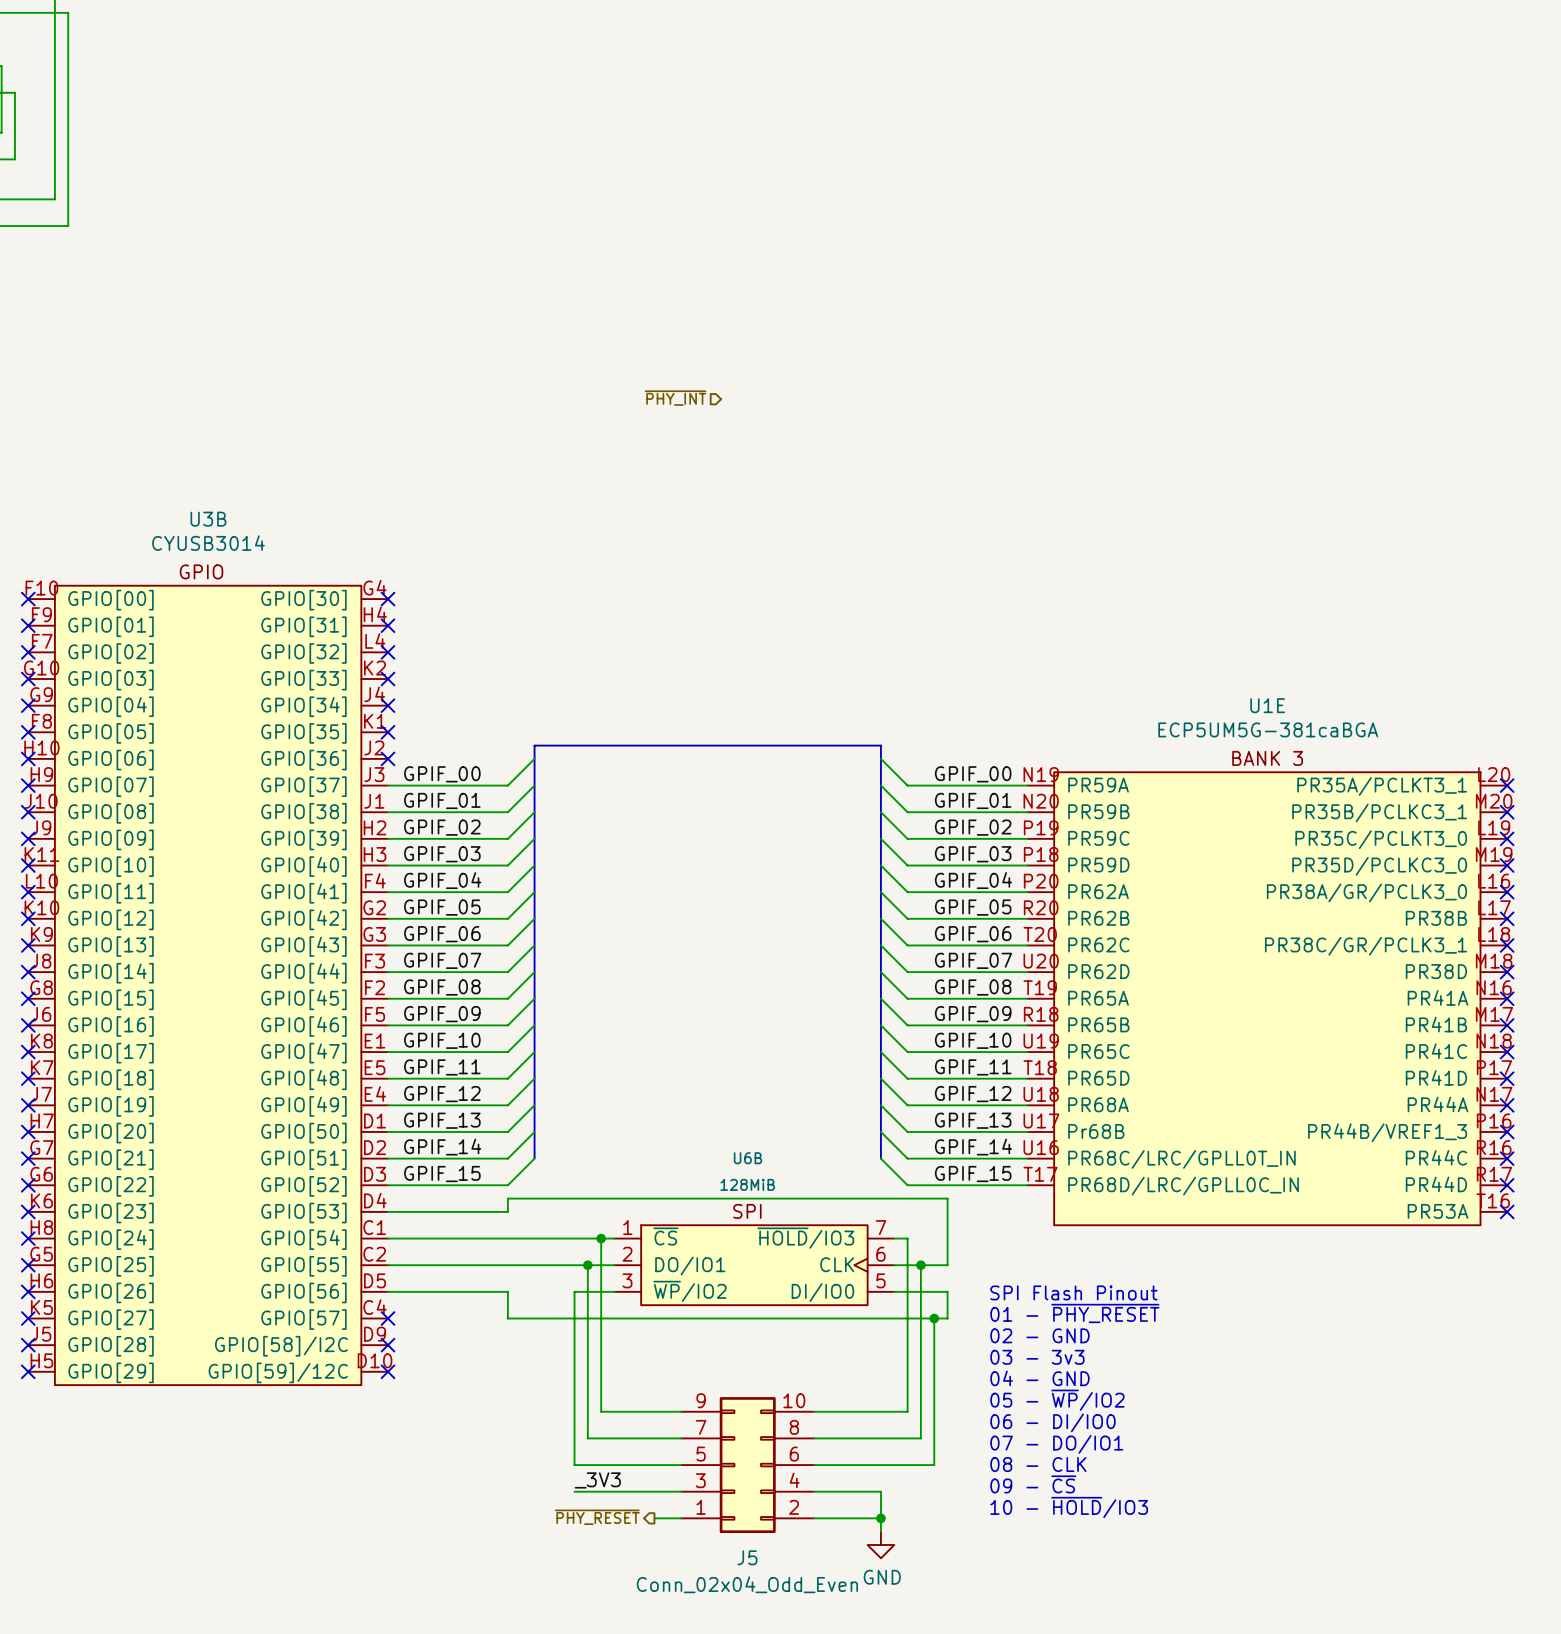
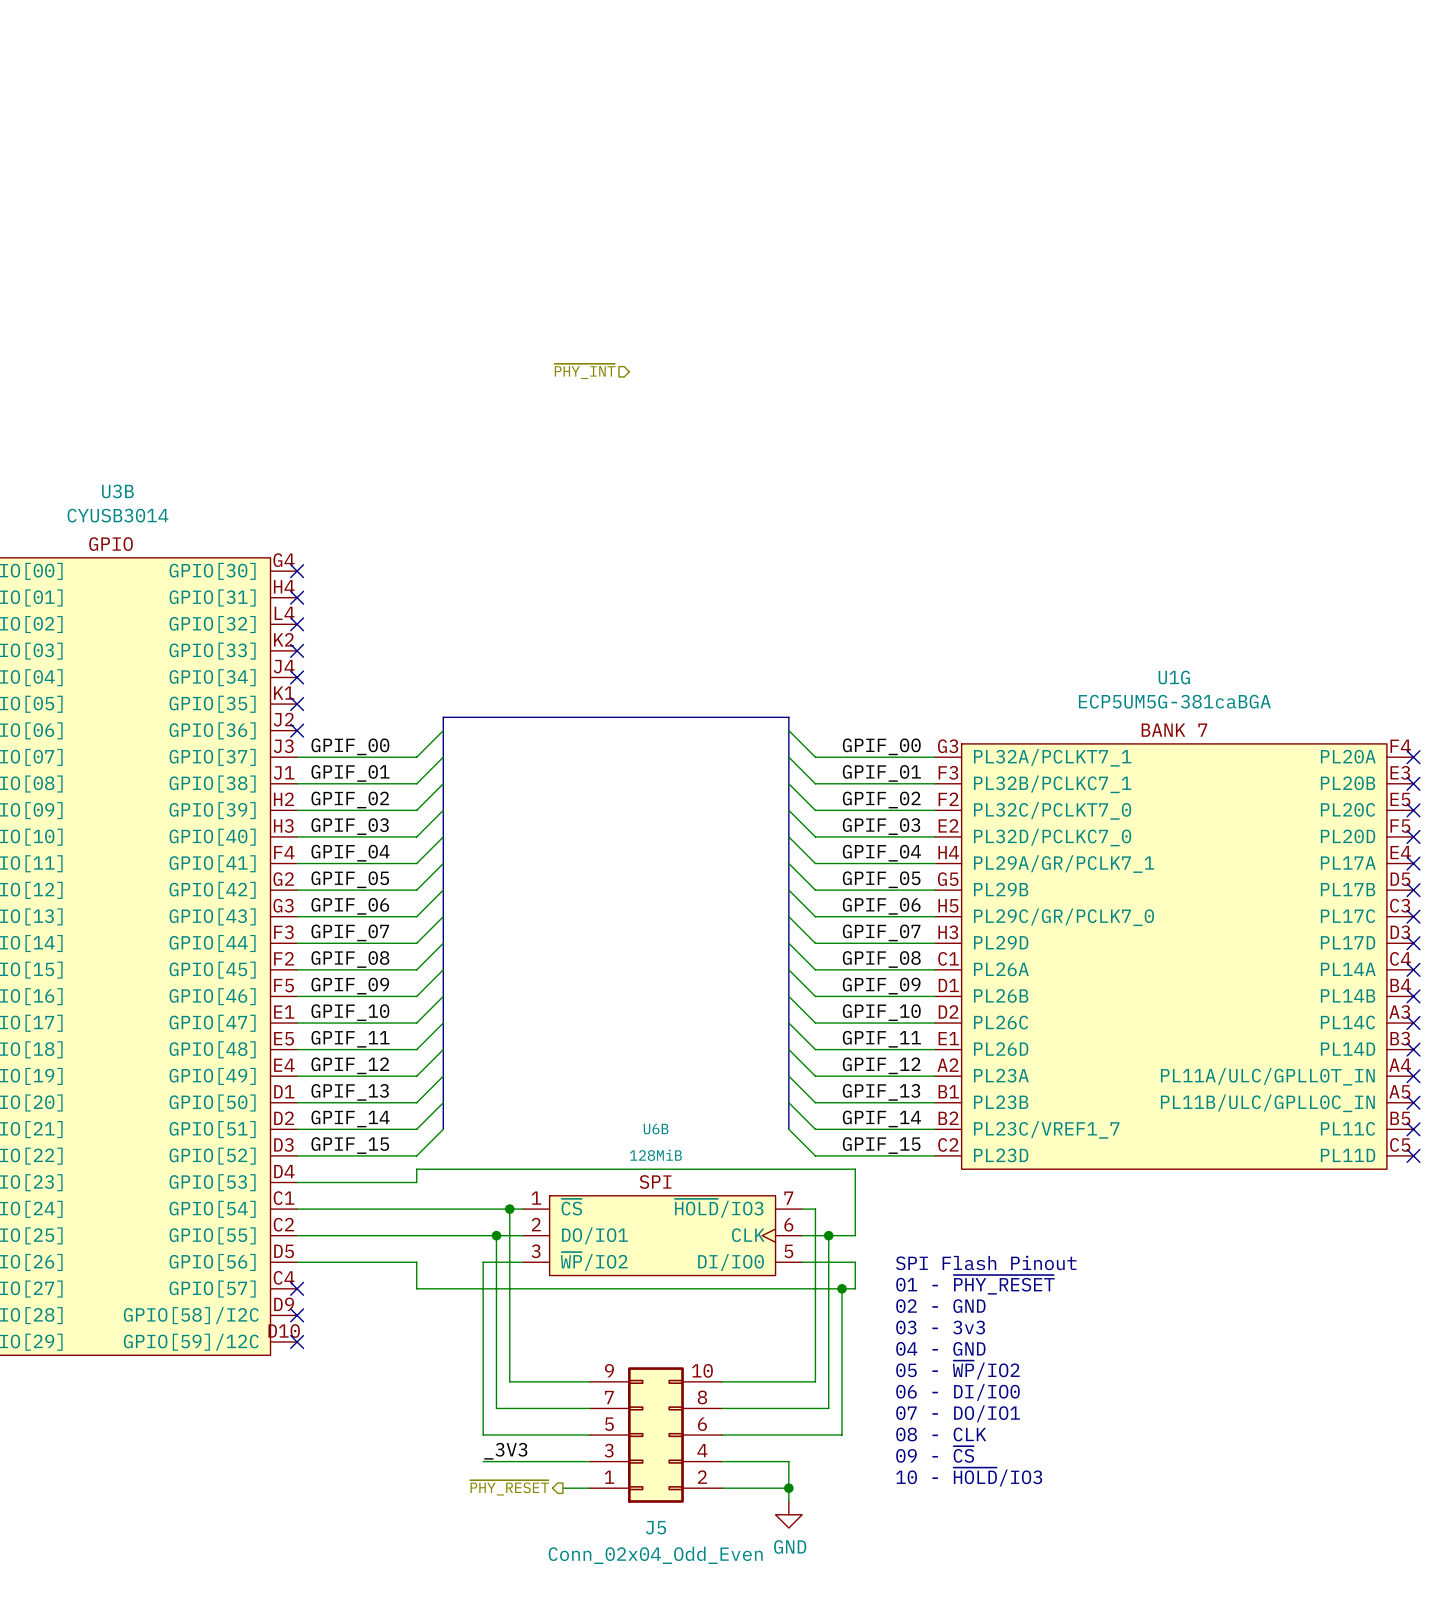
U1G: none -> ECP5UM5G-381caBGA (1174, 956)
U1E: ECP5UM5G-381caBGA (1267, 998) -> none
no-connect mark: (1507, 1211) -> none

